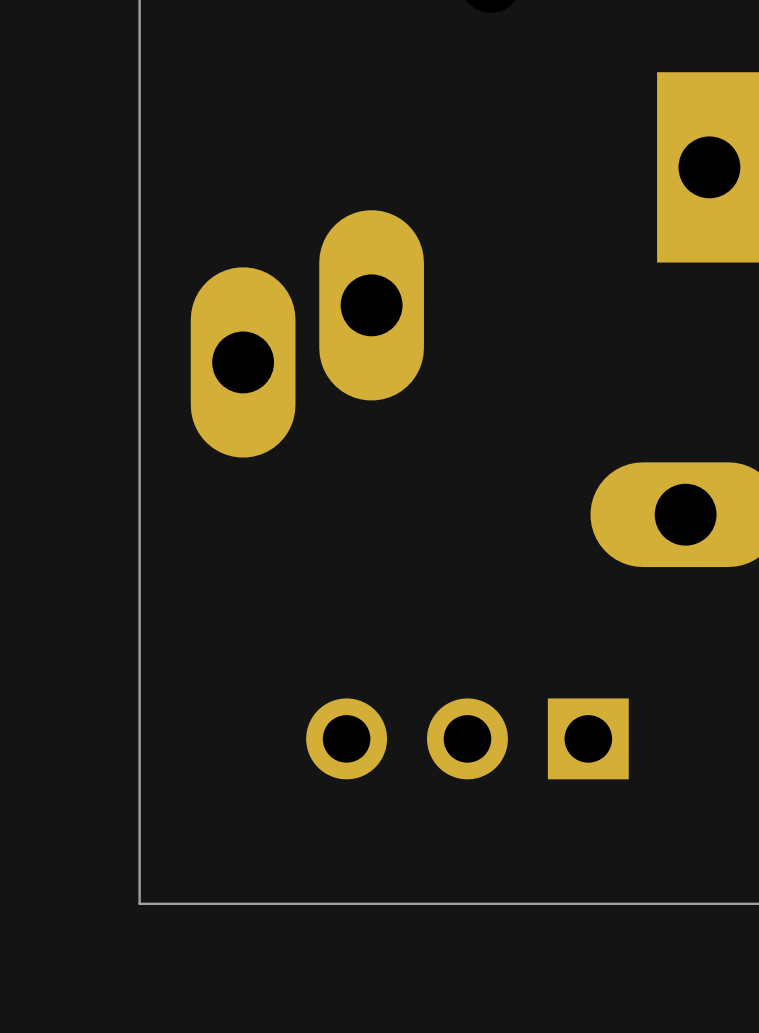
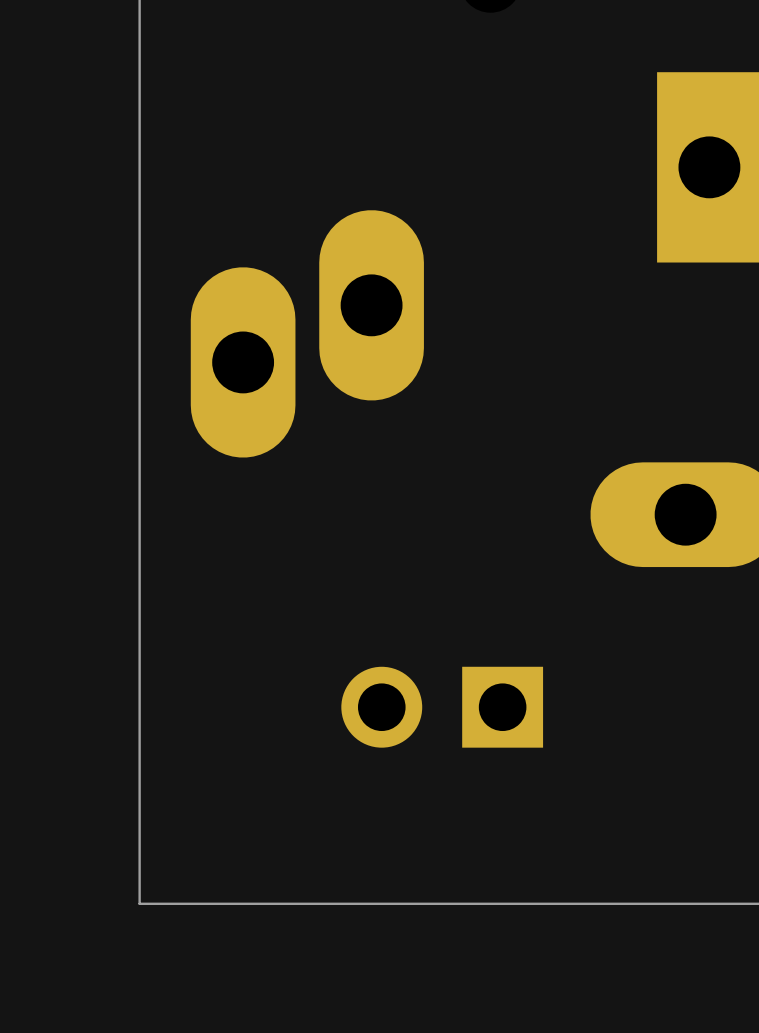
part footprint: [306, 698, 629, 780] -> [341, 666, 544, 748]

